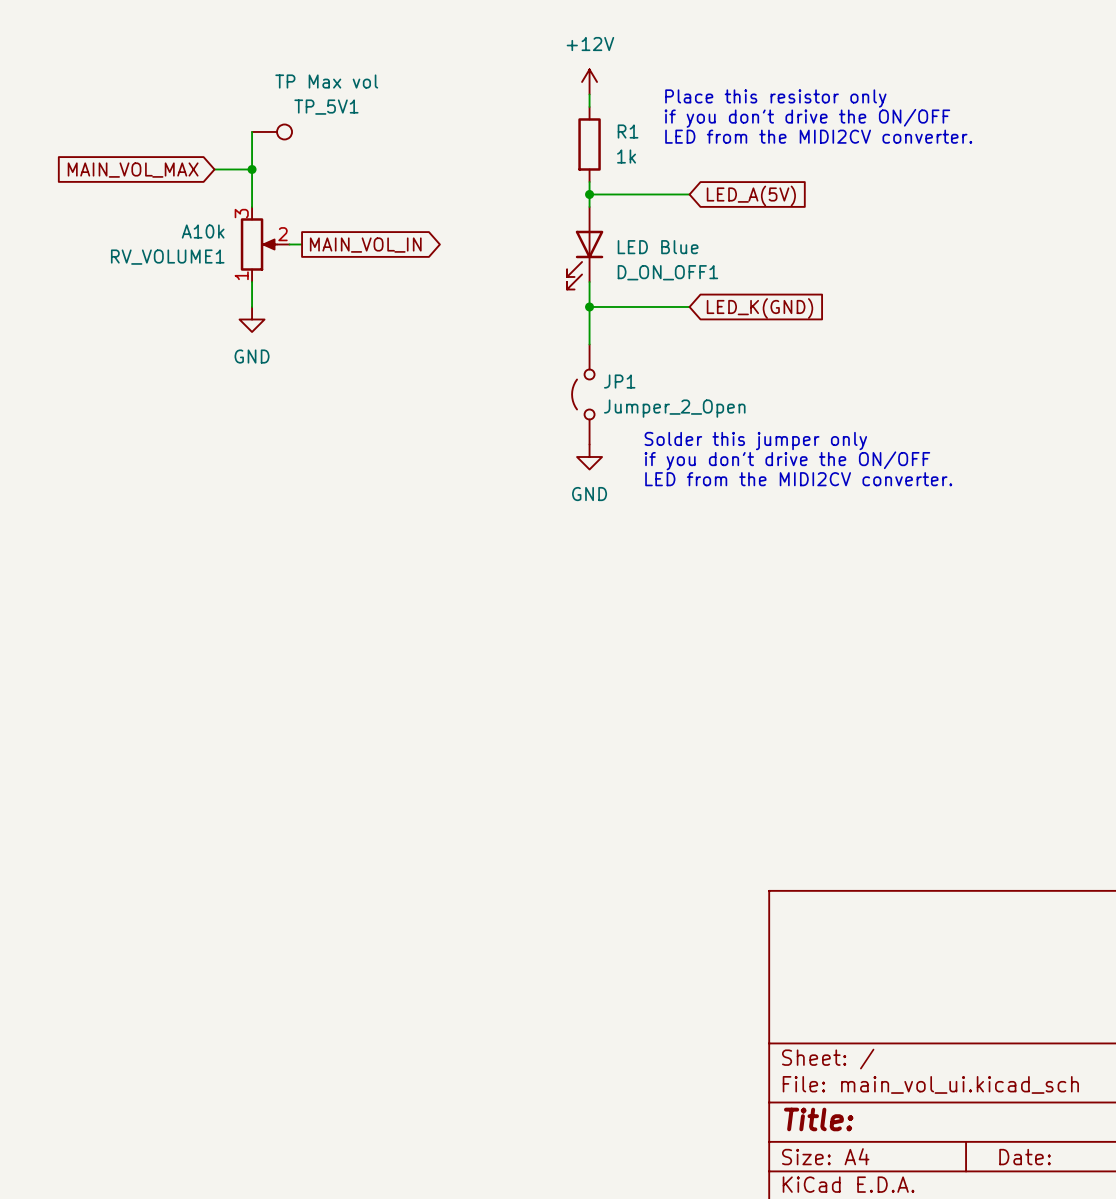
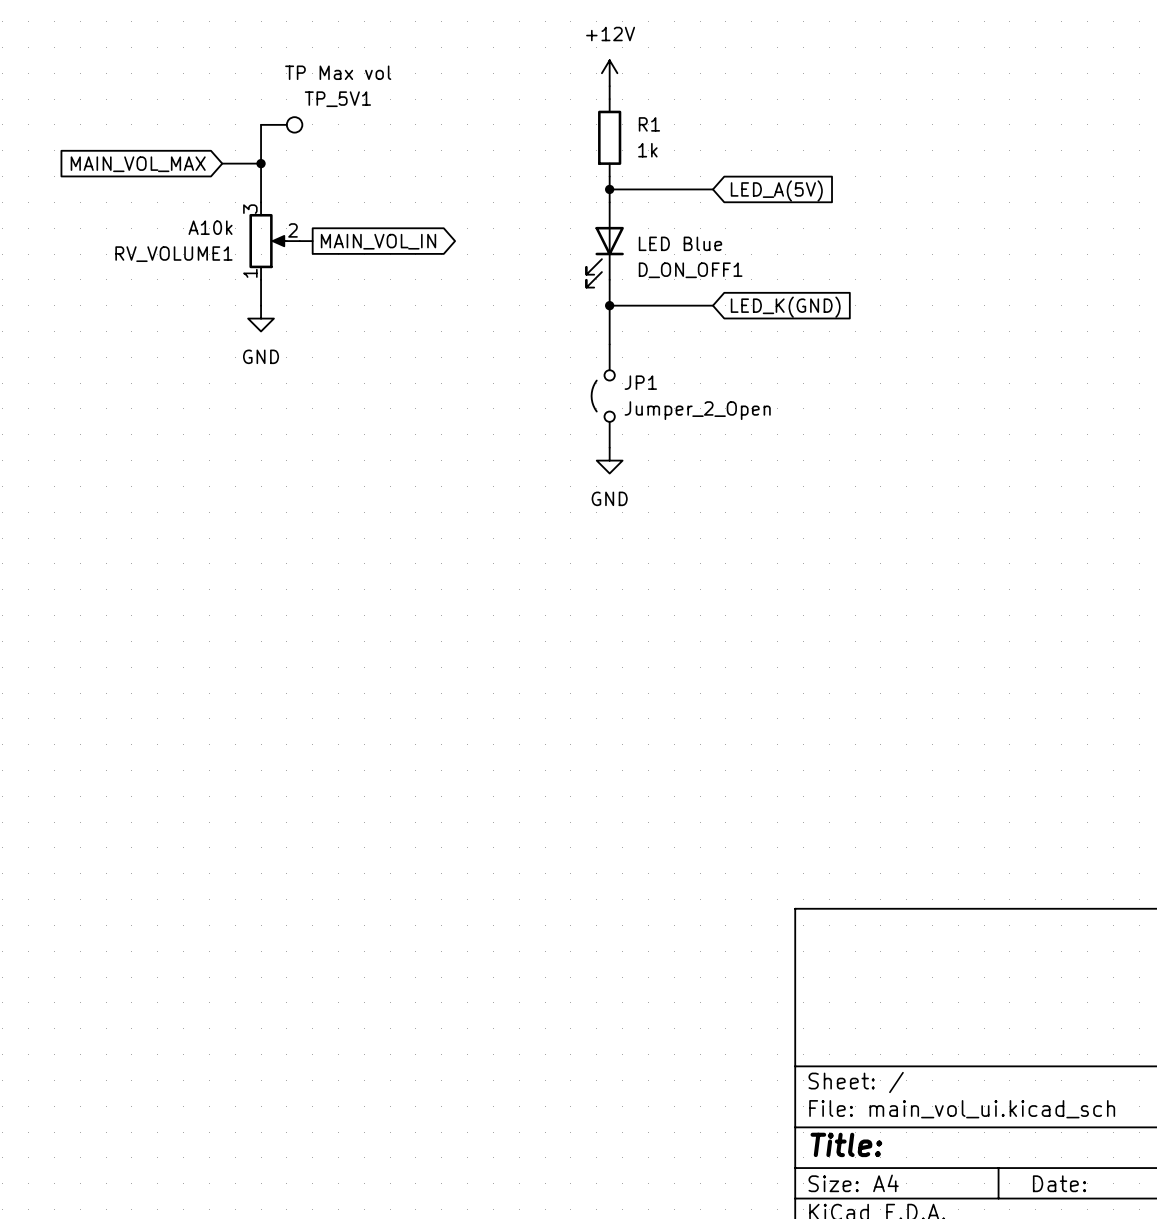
text: Place this resistor only (775, 98) -> none
text: if you don't drive the ON/OFF (807, 118) -> none
text: LED from the MIDI2CV converter. (818, 136) -> none
text: Solder this jumper only (755, 441) -> none
text: if you don't drive the ON/OFF (787, 460) -> none
text: LED from the MIDI2CV converter. (798, 479) -> none

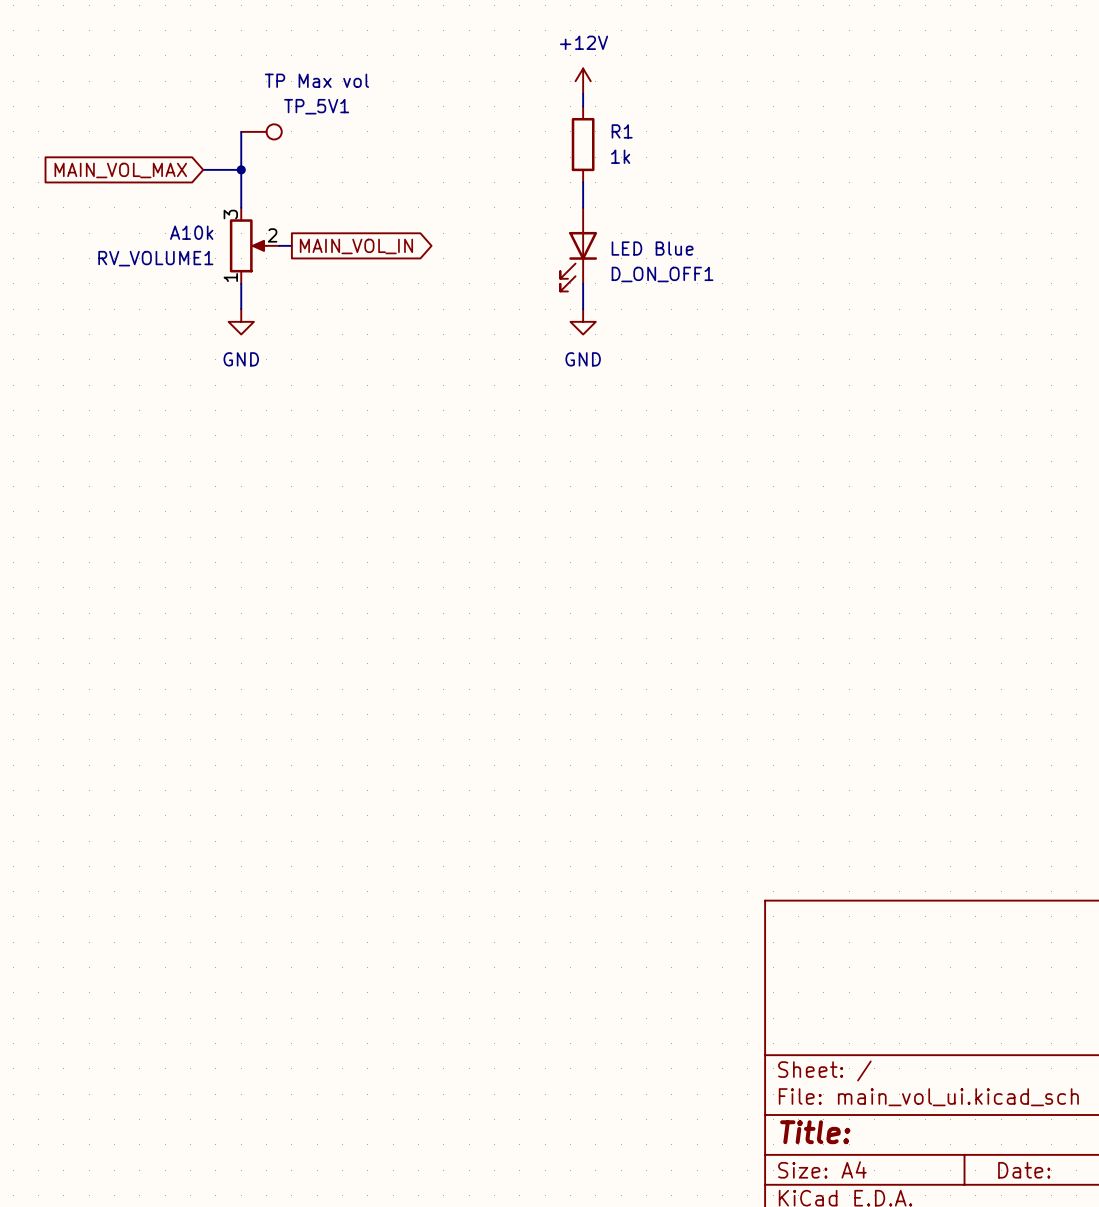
wire: (609, 189) (712, 189) -> none
junction: (609, 189) -> none
global label: LED_A(5V) (776, 190) -> none
junction: (609, 305) -> none
wire: (712, 305) (609, 305) (609, 344) -> none
global label: LED_K(GND) (785, 307) -> none
JP1: Jumper_2_Open (603, 396) -> none
power symbol position: GND (609, 460) -> GND (583, 321)

